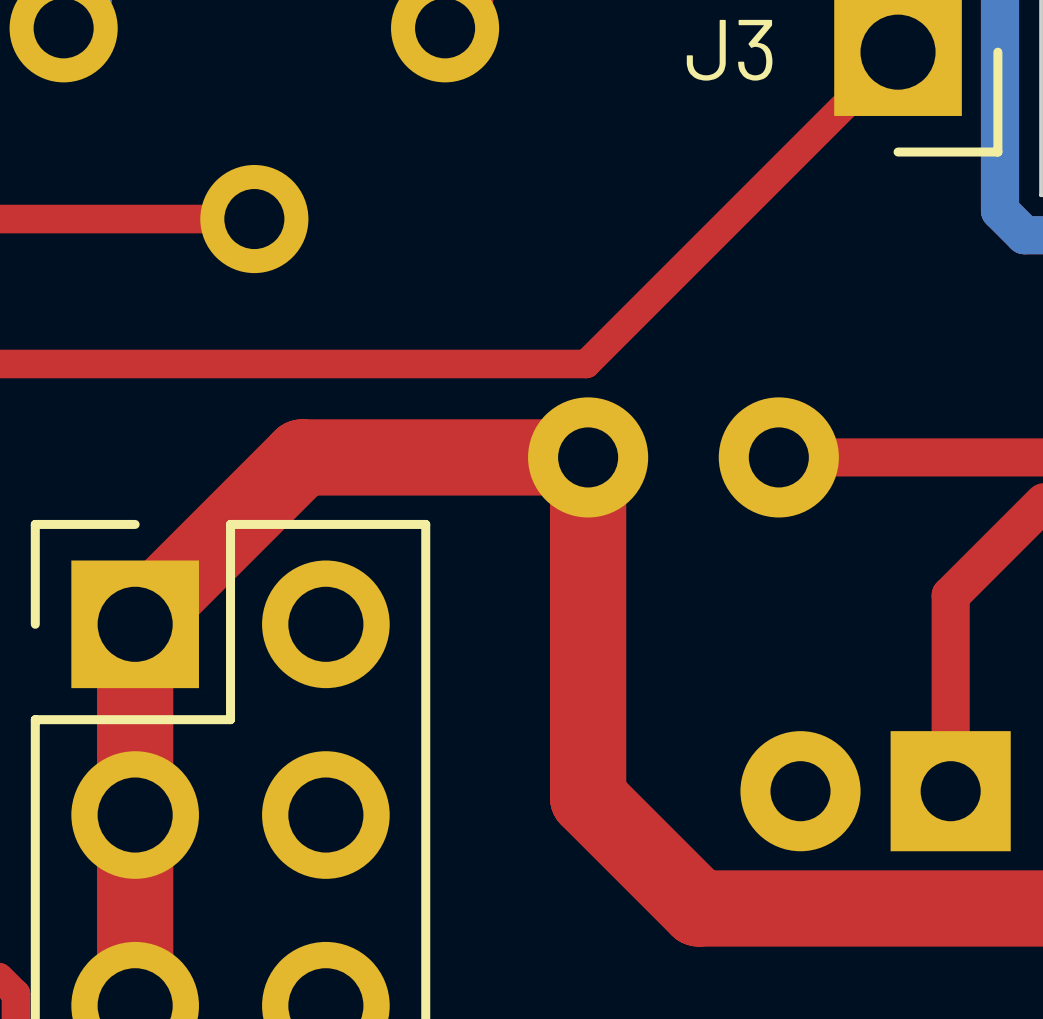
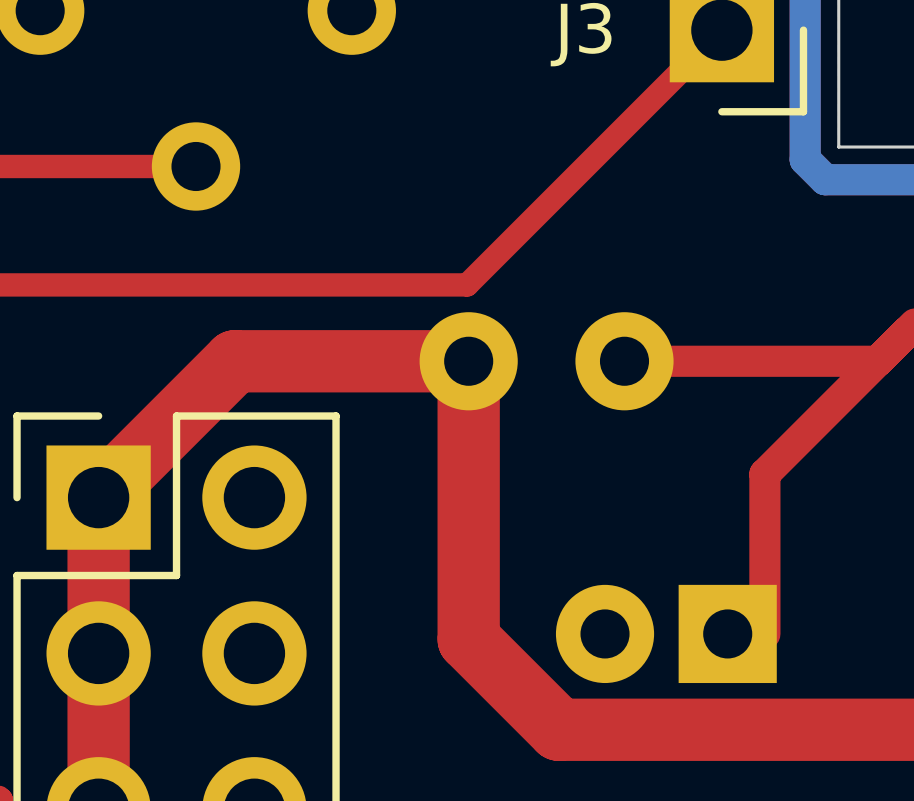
part position: (875, 791) -> (666, 633)

